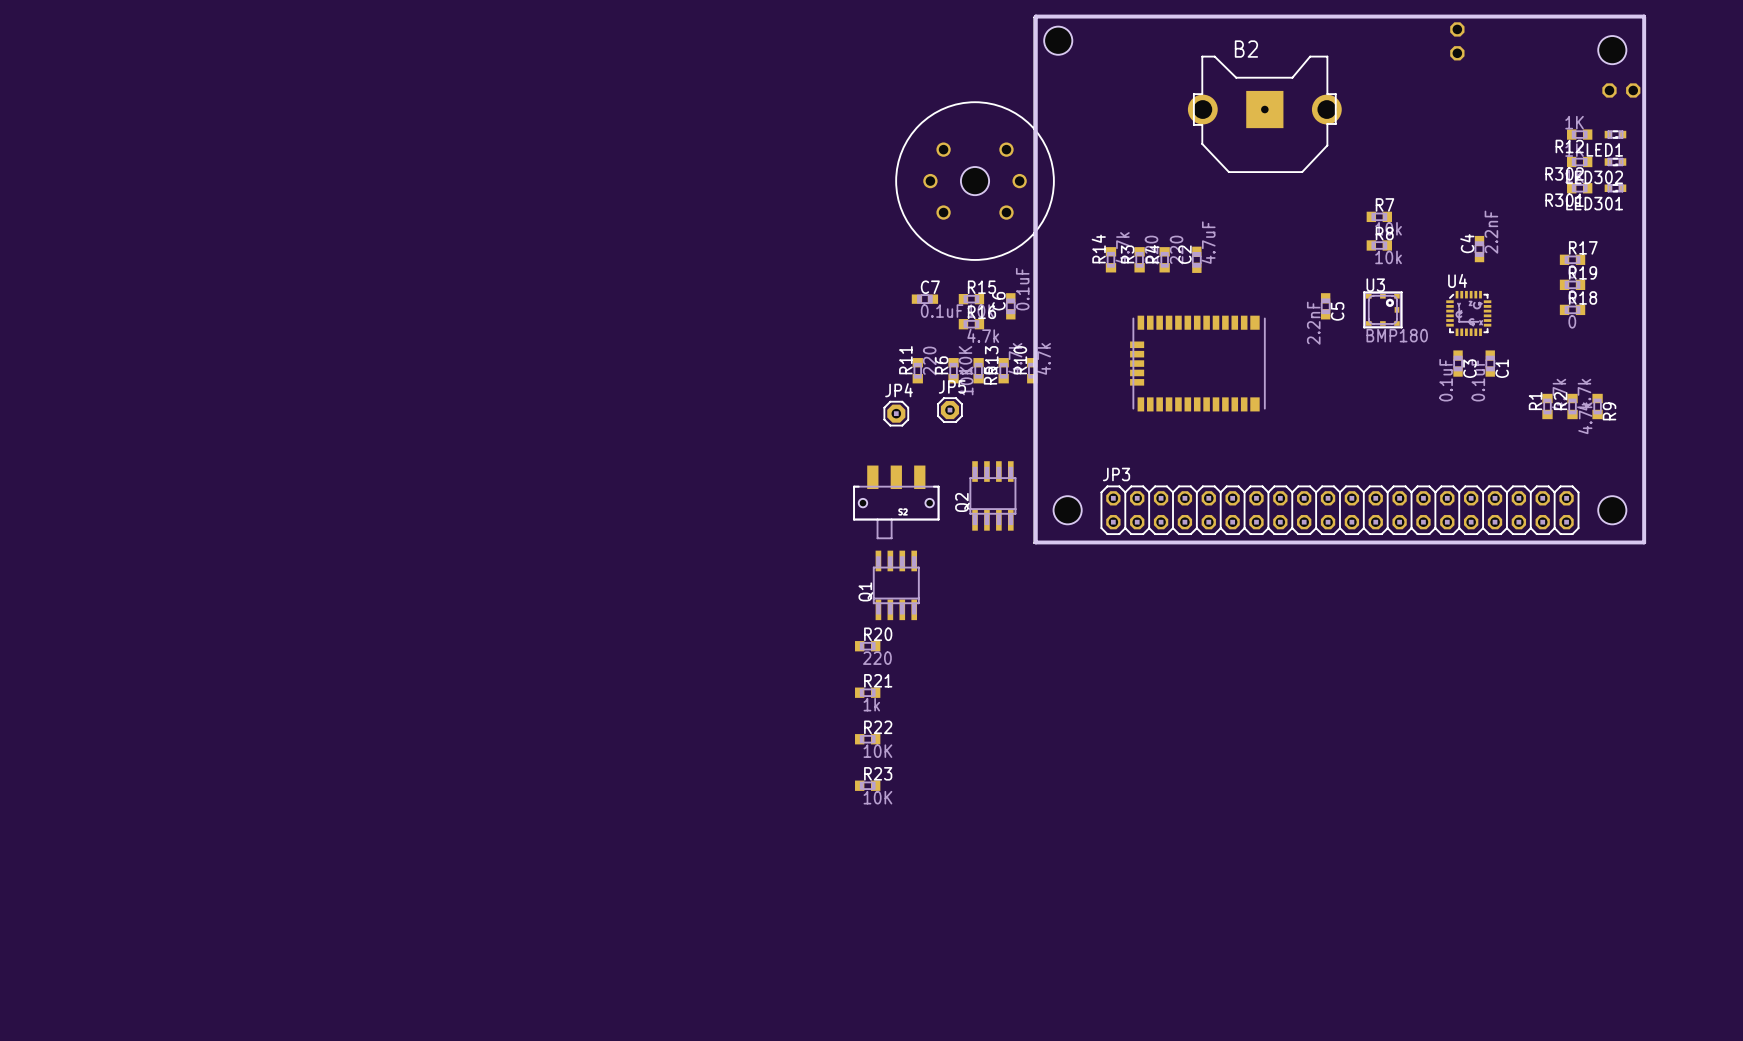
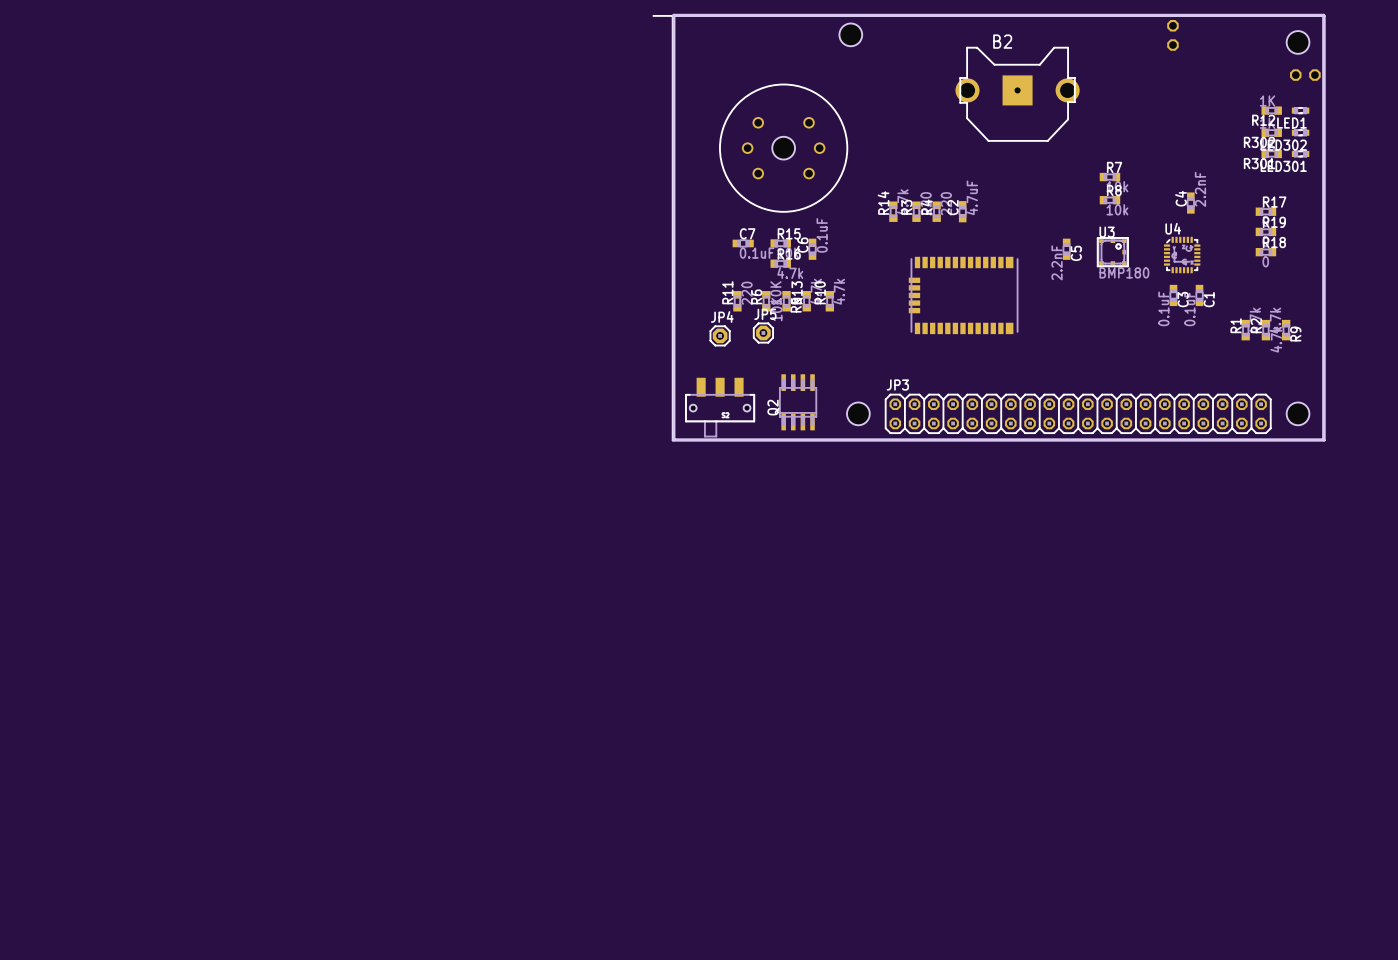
JP3 footprint: [1033, 16, 1646, 544] -> [652, 15, 1326, 441]
board edge: (1035, 16) (1035, 542) -> (832, 15) (673, 15) (673, 439) (832, 439)
Q1: (896, 585) -> none
R20: 220 (867, 646) -> none
R21: 1k (867, 692) -> none
R22: 10K (867, 739) -> none
R23: 10K (867, 785) -> none

